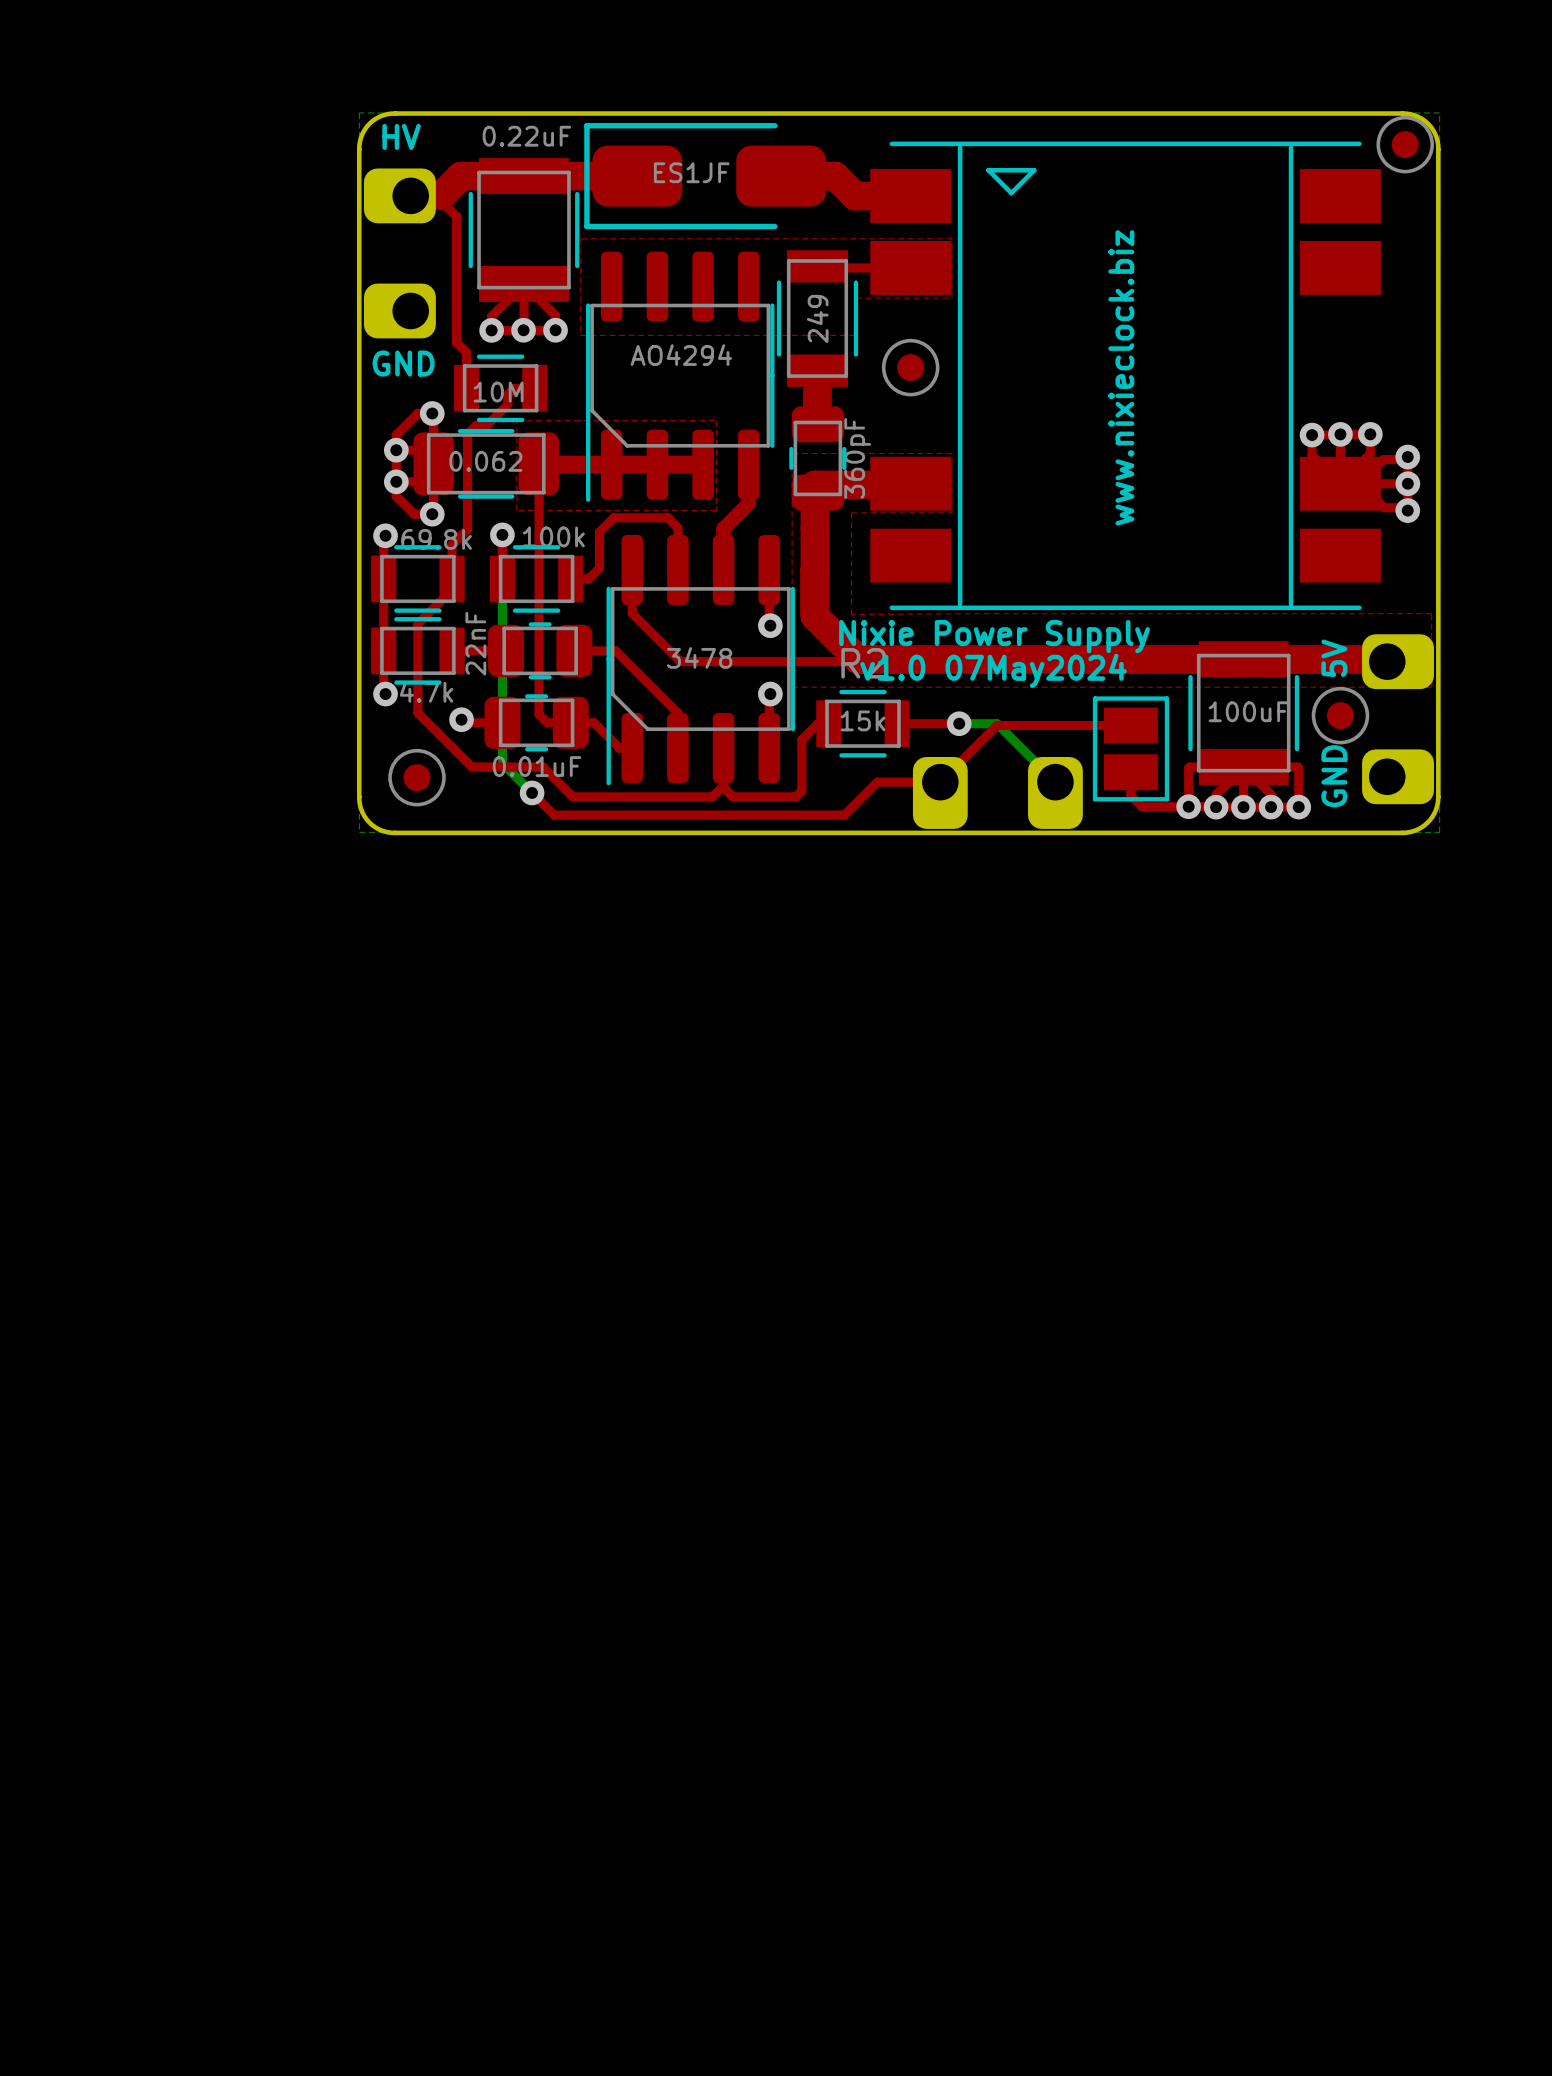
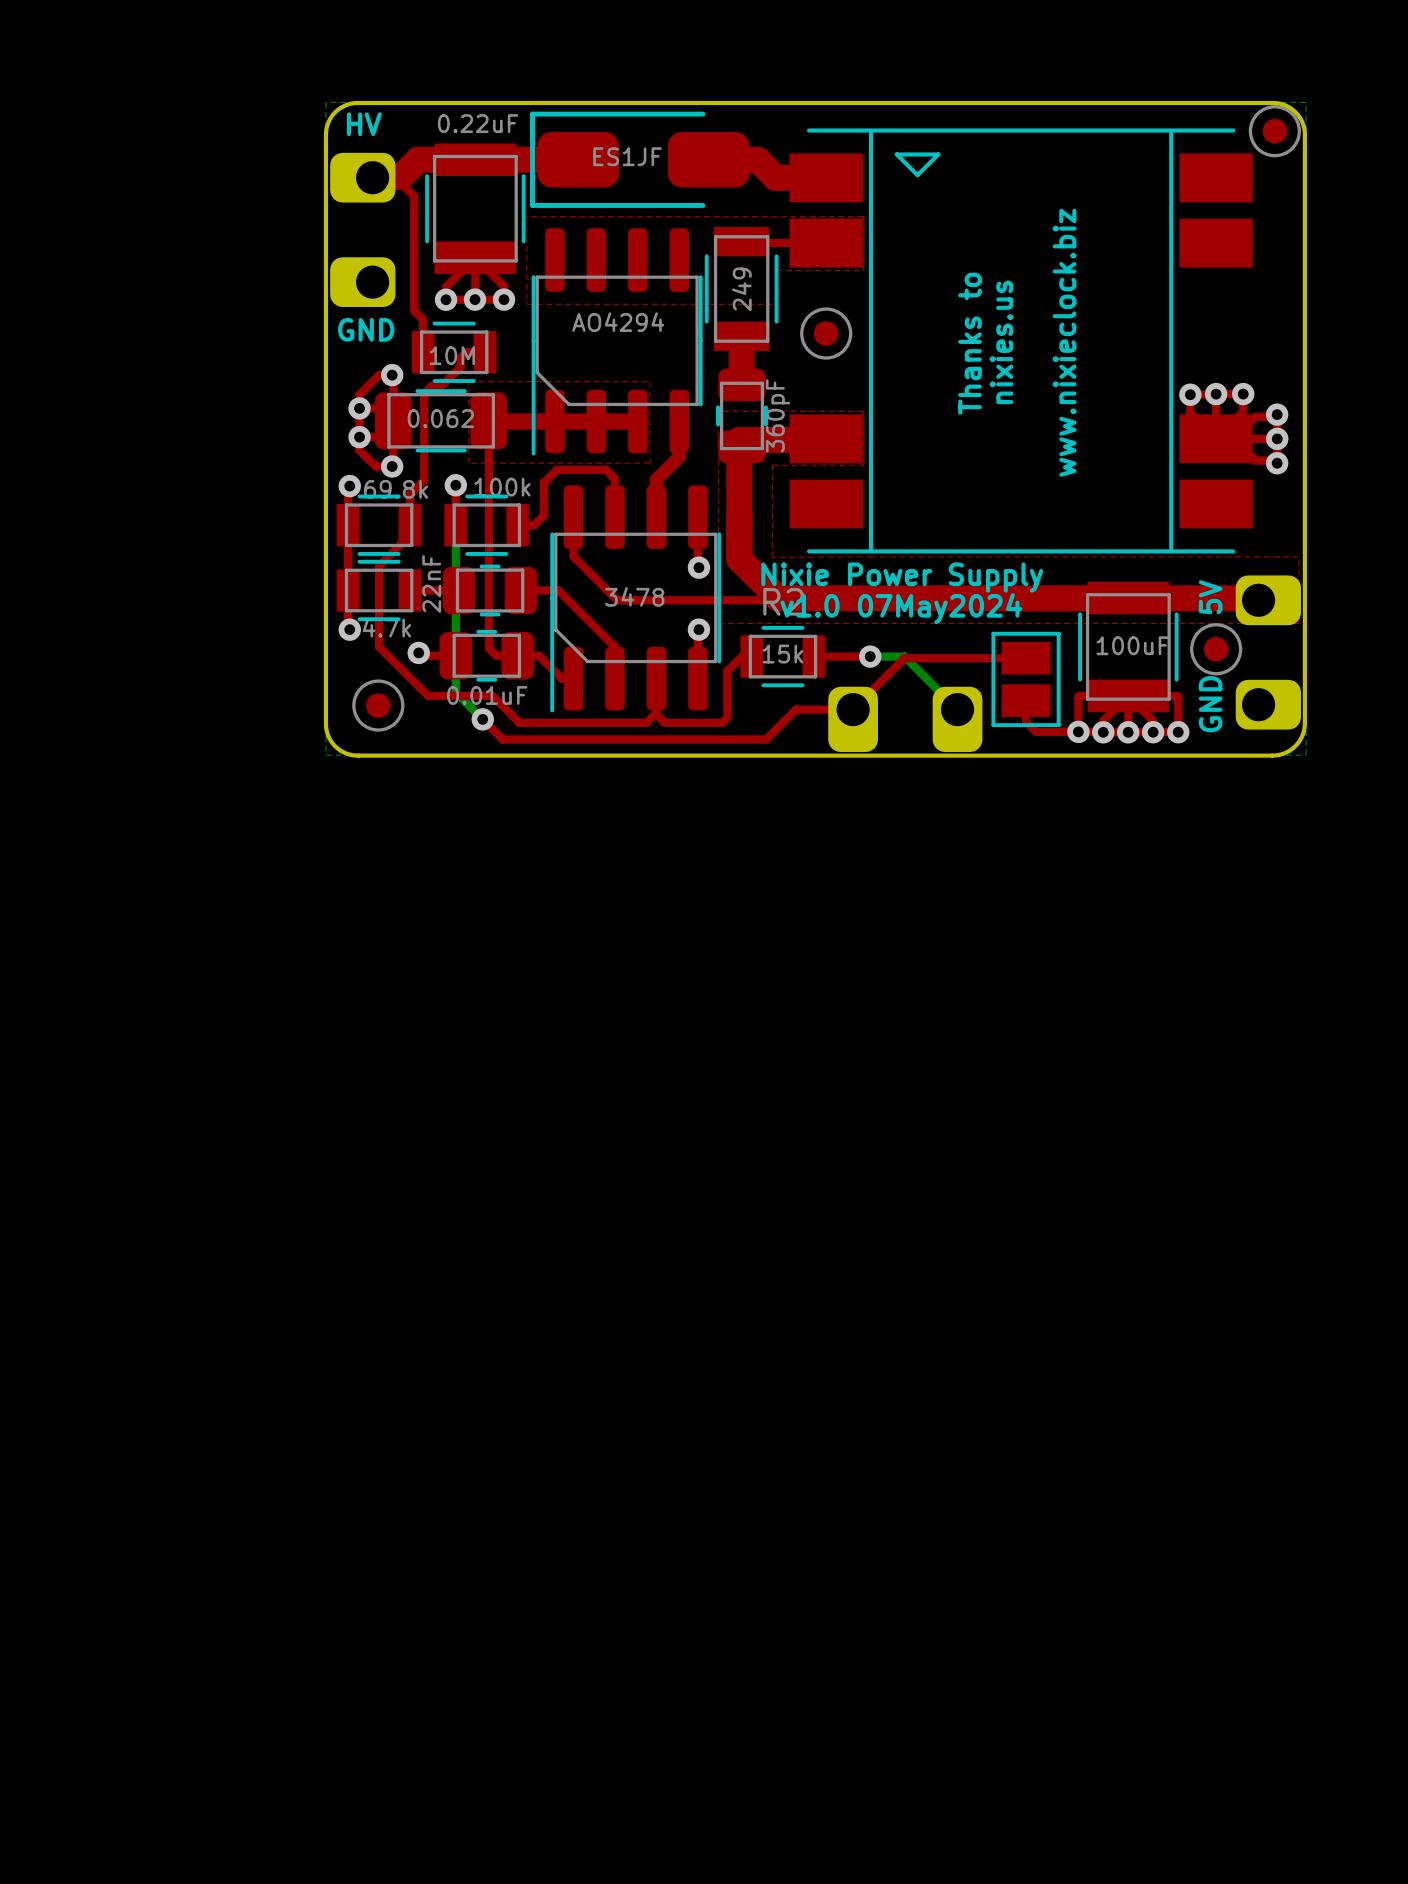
text: www.nixieclock.biz (1121, 377) -> nixies.us (1001, 342)
text: none -> www.nixieclock.biz (1064, 342)
text: none -> Thanks to (970, 343)

